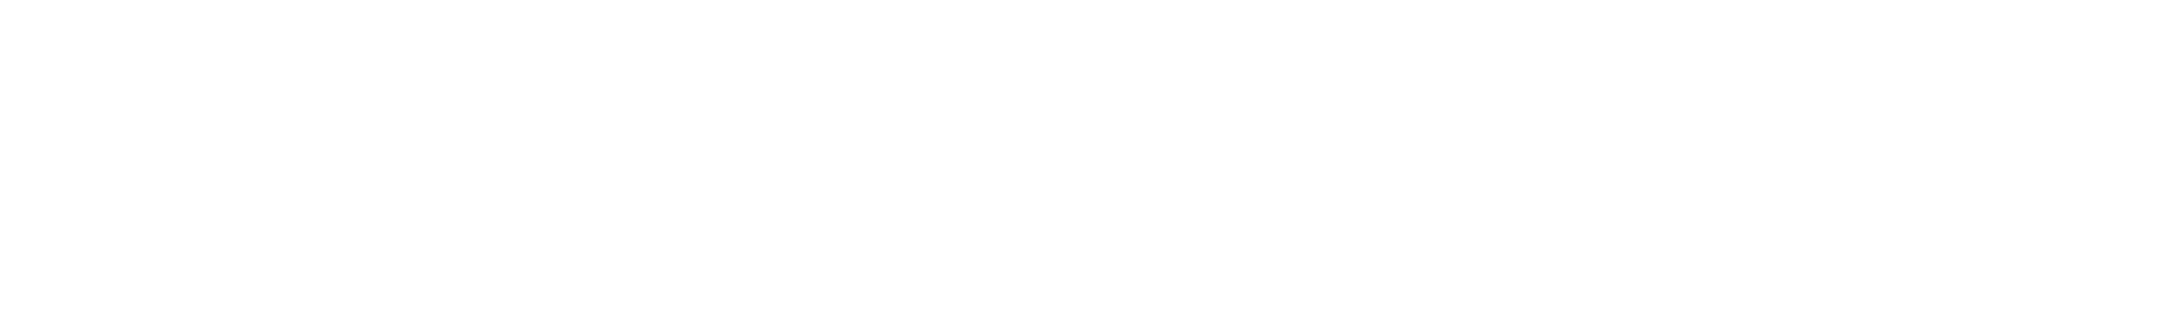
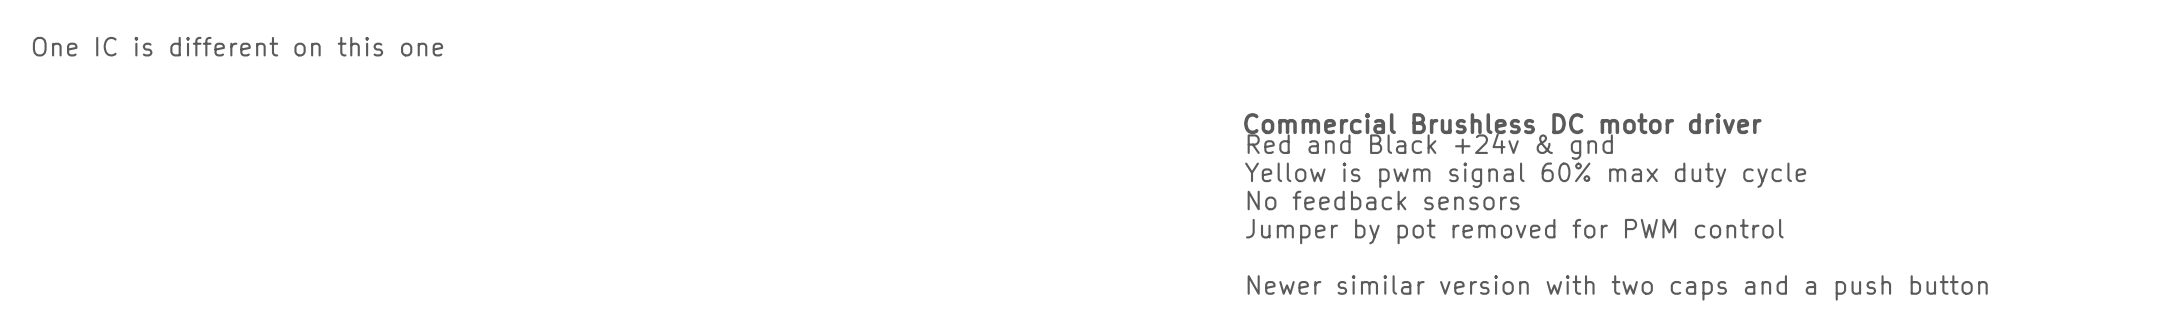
text: none -> One IC is different on this one (238, 46)
text: none -> Commercial Brushless DC motor driver (1502, 123)
text: none -> Red and Black +24v & gnd (1430, 146)
text: none -> Yellow is pwm signal 60% max duty cycle (1525, 175)
text: none -> No feedback sensors (1383, 200)
text: none -> Jumper by pot removed for PWM control (1514, 231)
text: none -> Newer similar version with two caps and a push button (1617, 287)

